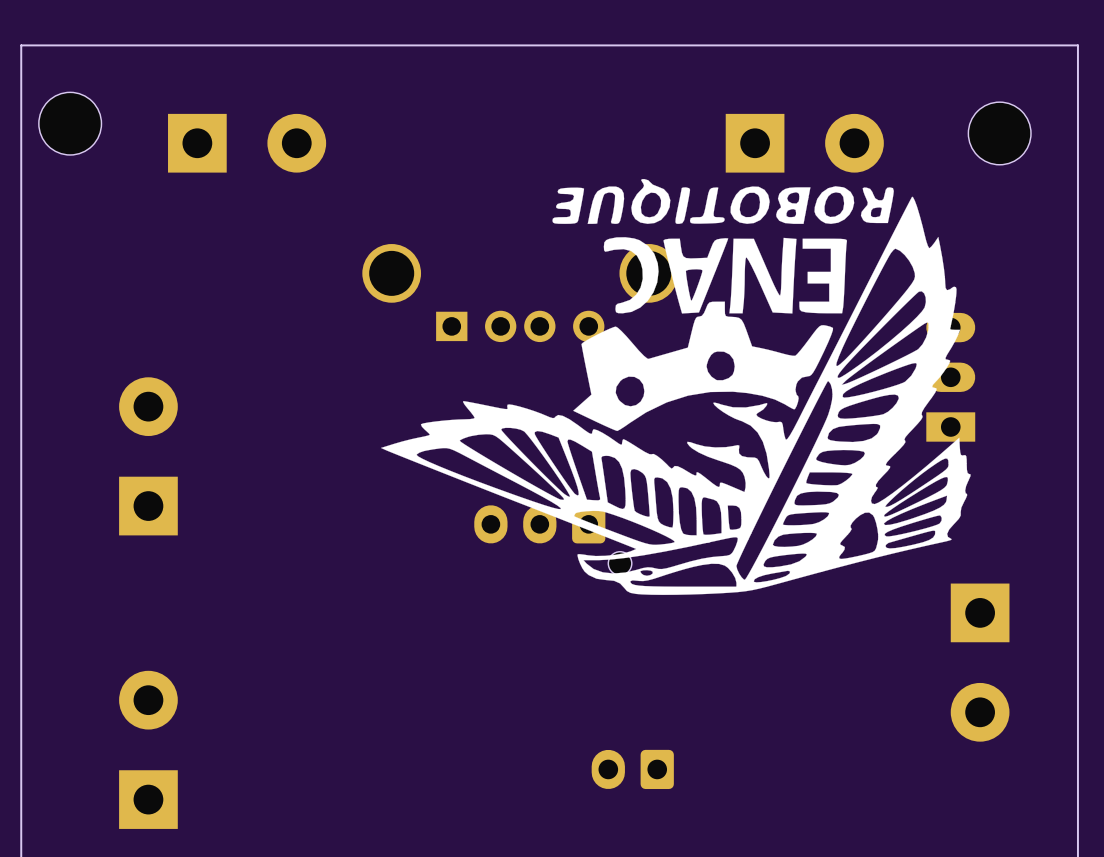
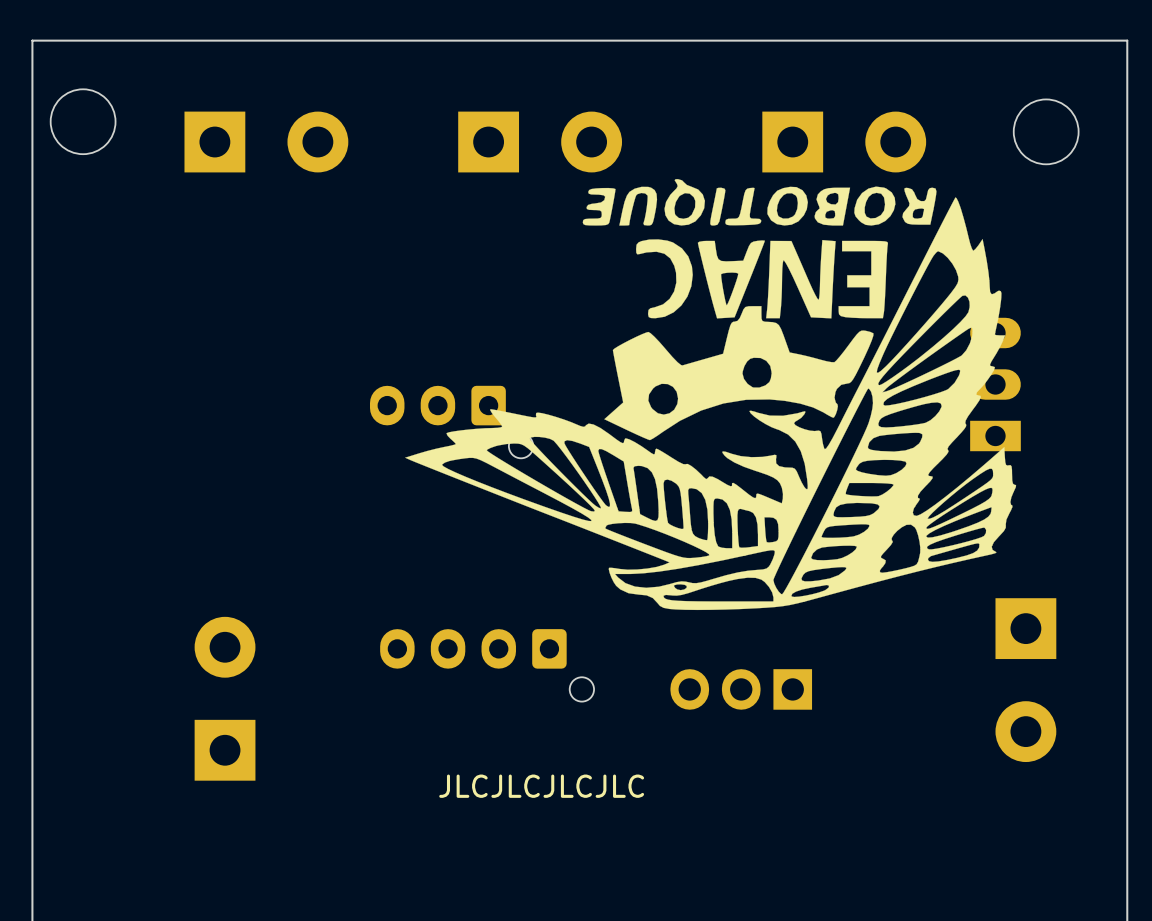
part: none -> (540, 142)
part: (520, 293) -> none
part: (148, 456) -> none
part position: (553, 540) -> (451, 422)
part: none -> (487, 665)
part: none -> (741, 689)
part position: (148, 749) -> (225, 698)
text: none -> JLCJLCJLCJLC (541, 786)
part: (632, 769) -> none

